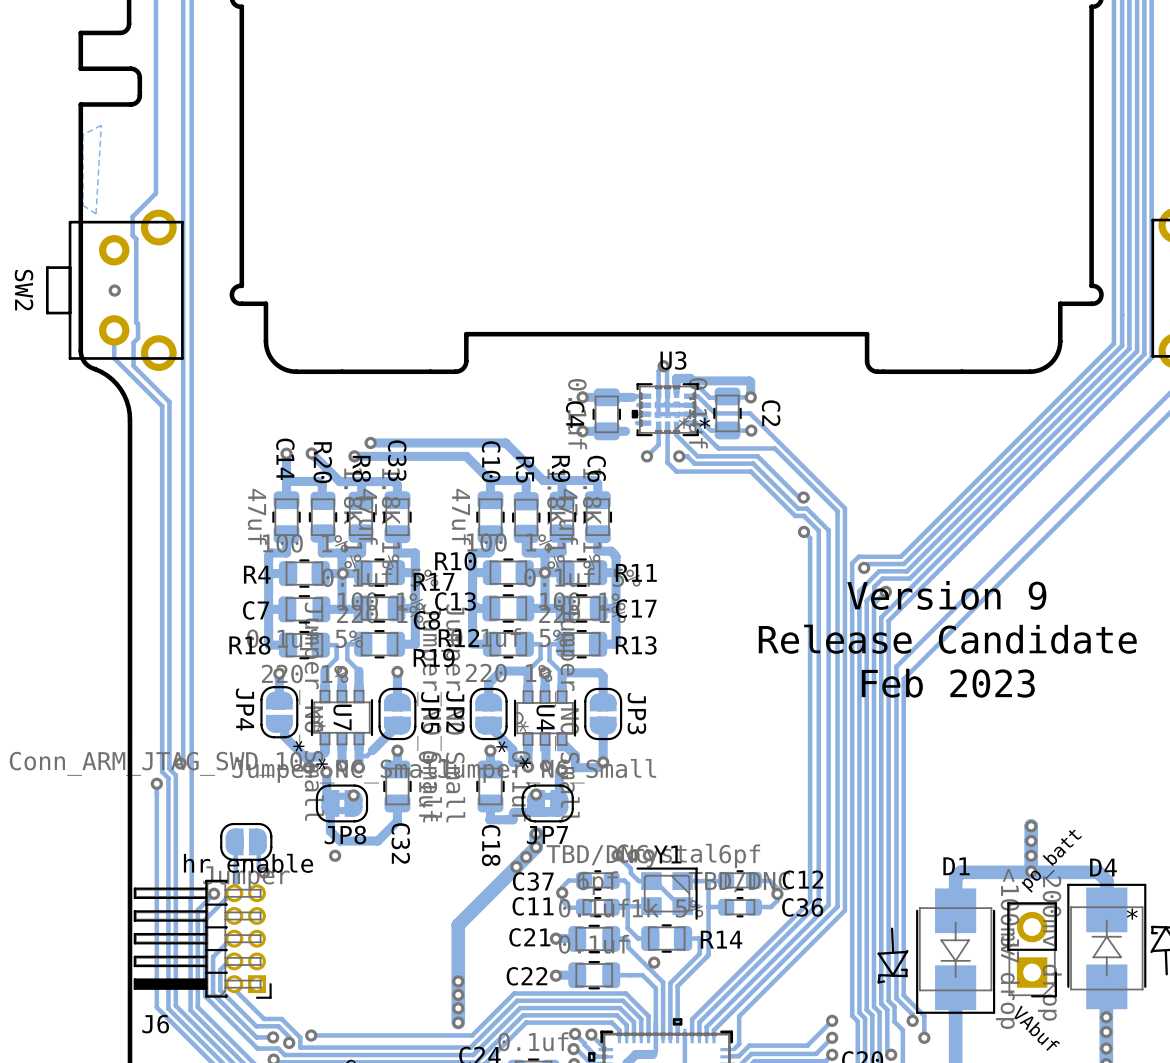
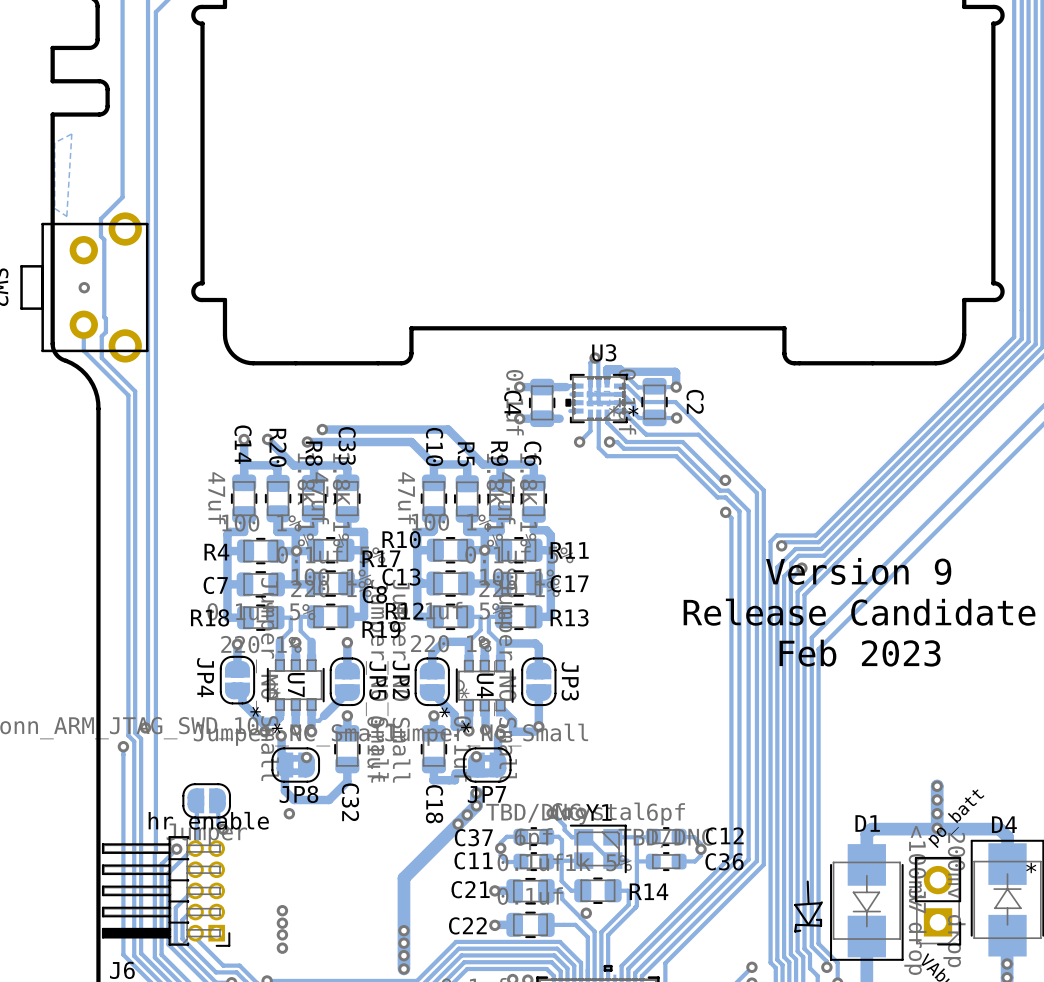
via: none -> (282, 910)
via: none -> (282, 923)
via: none -> (282, 934)
via: none -> (282, 948)

